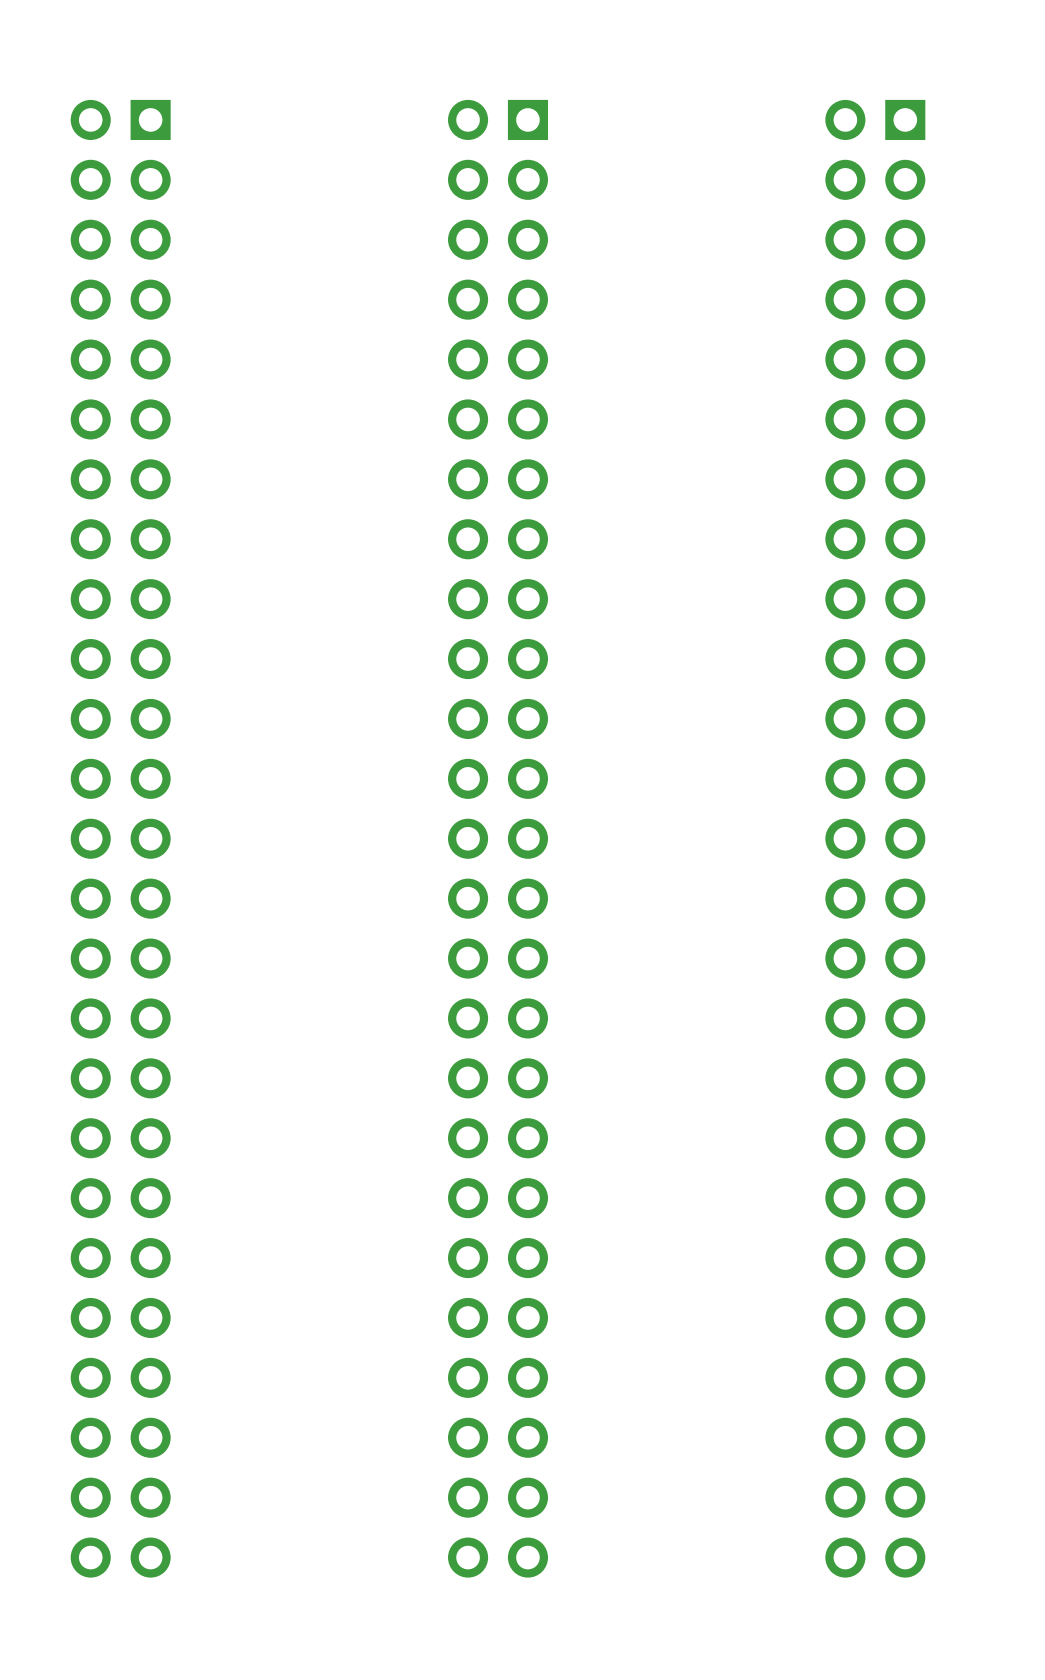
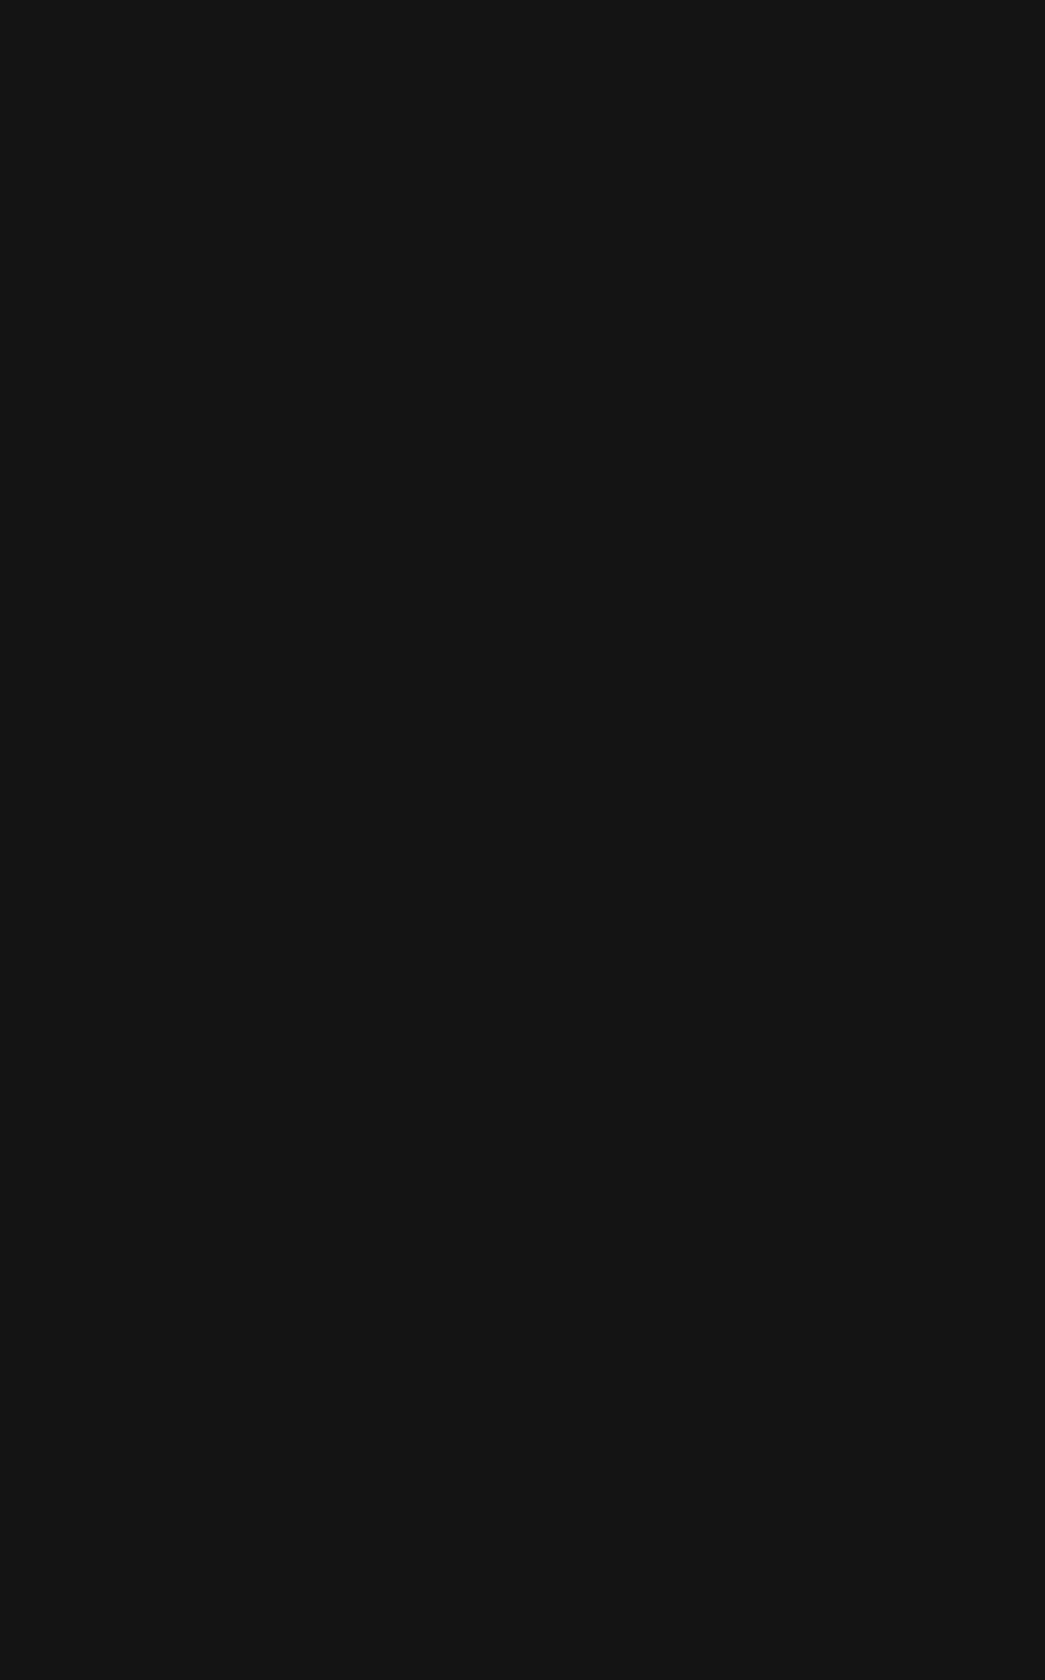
part: (120, 838) -> none
part: (498, 838) -> none
part: (875, 838) -> none

